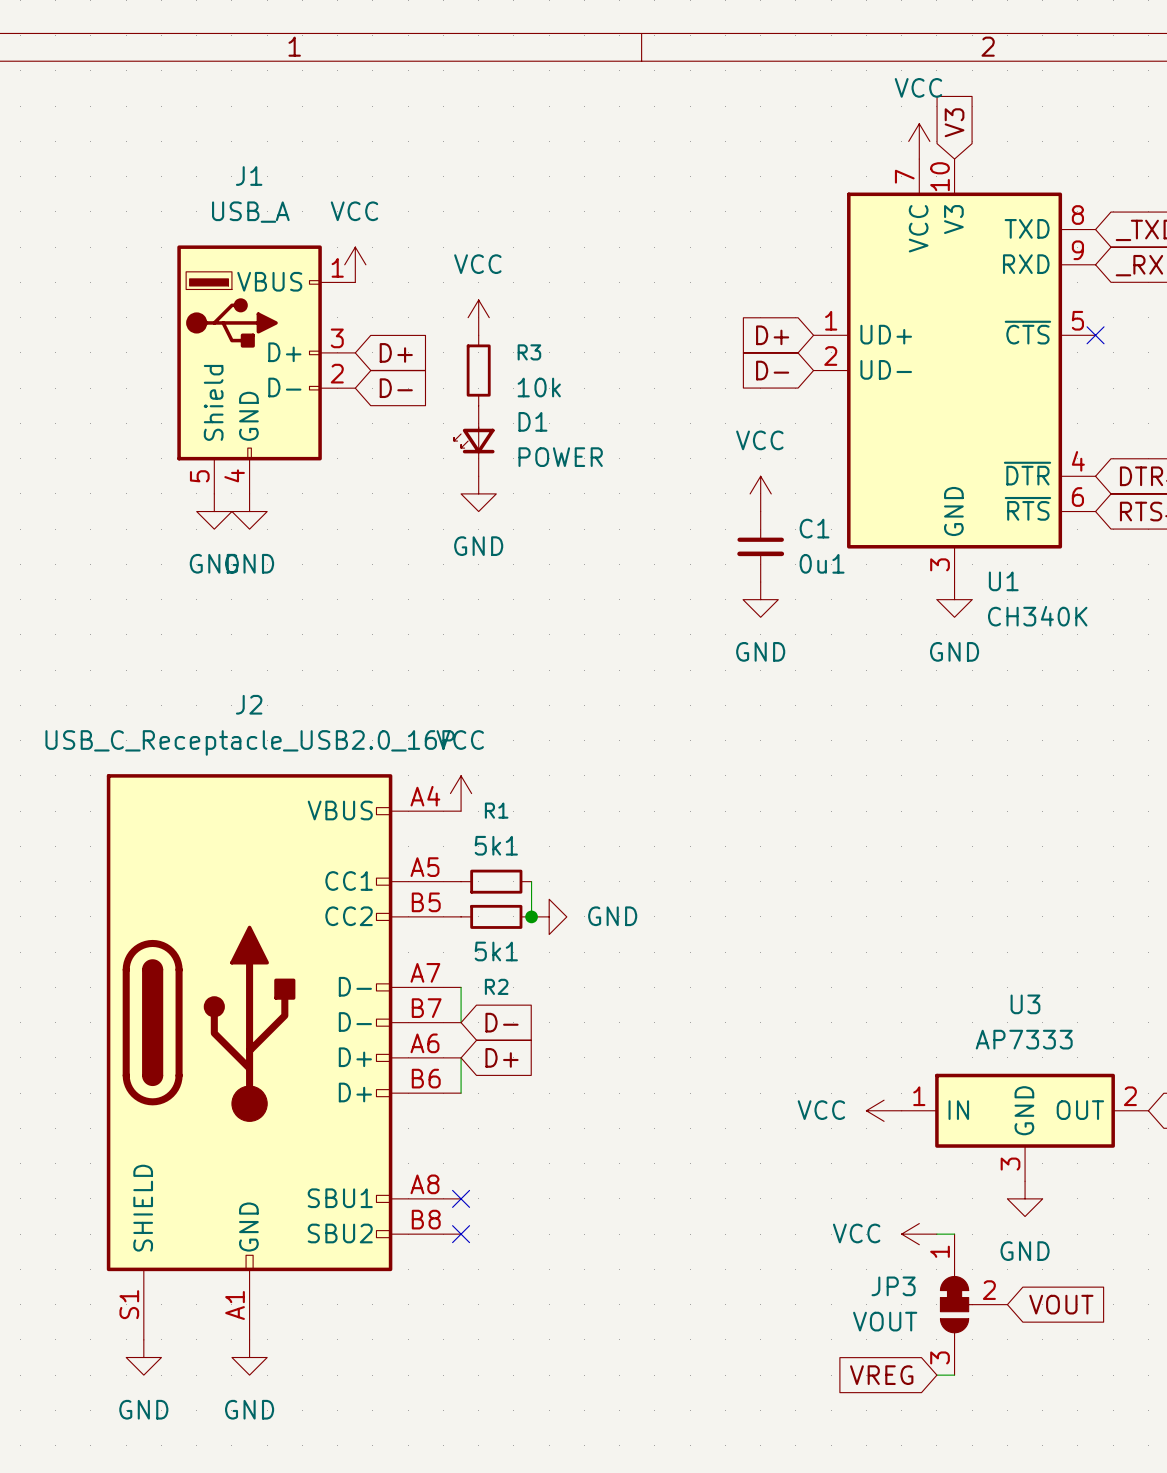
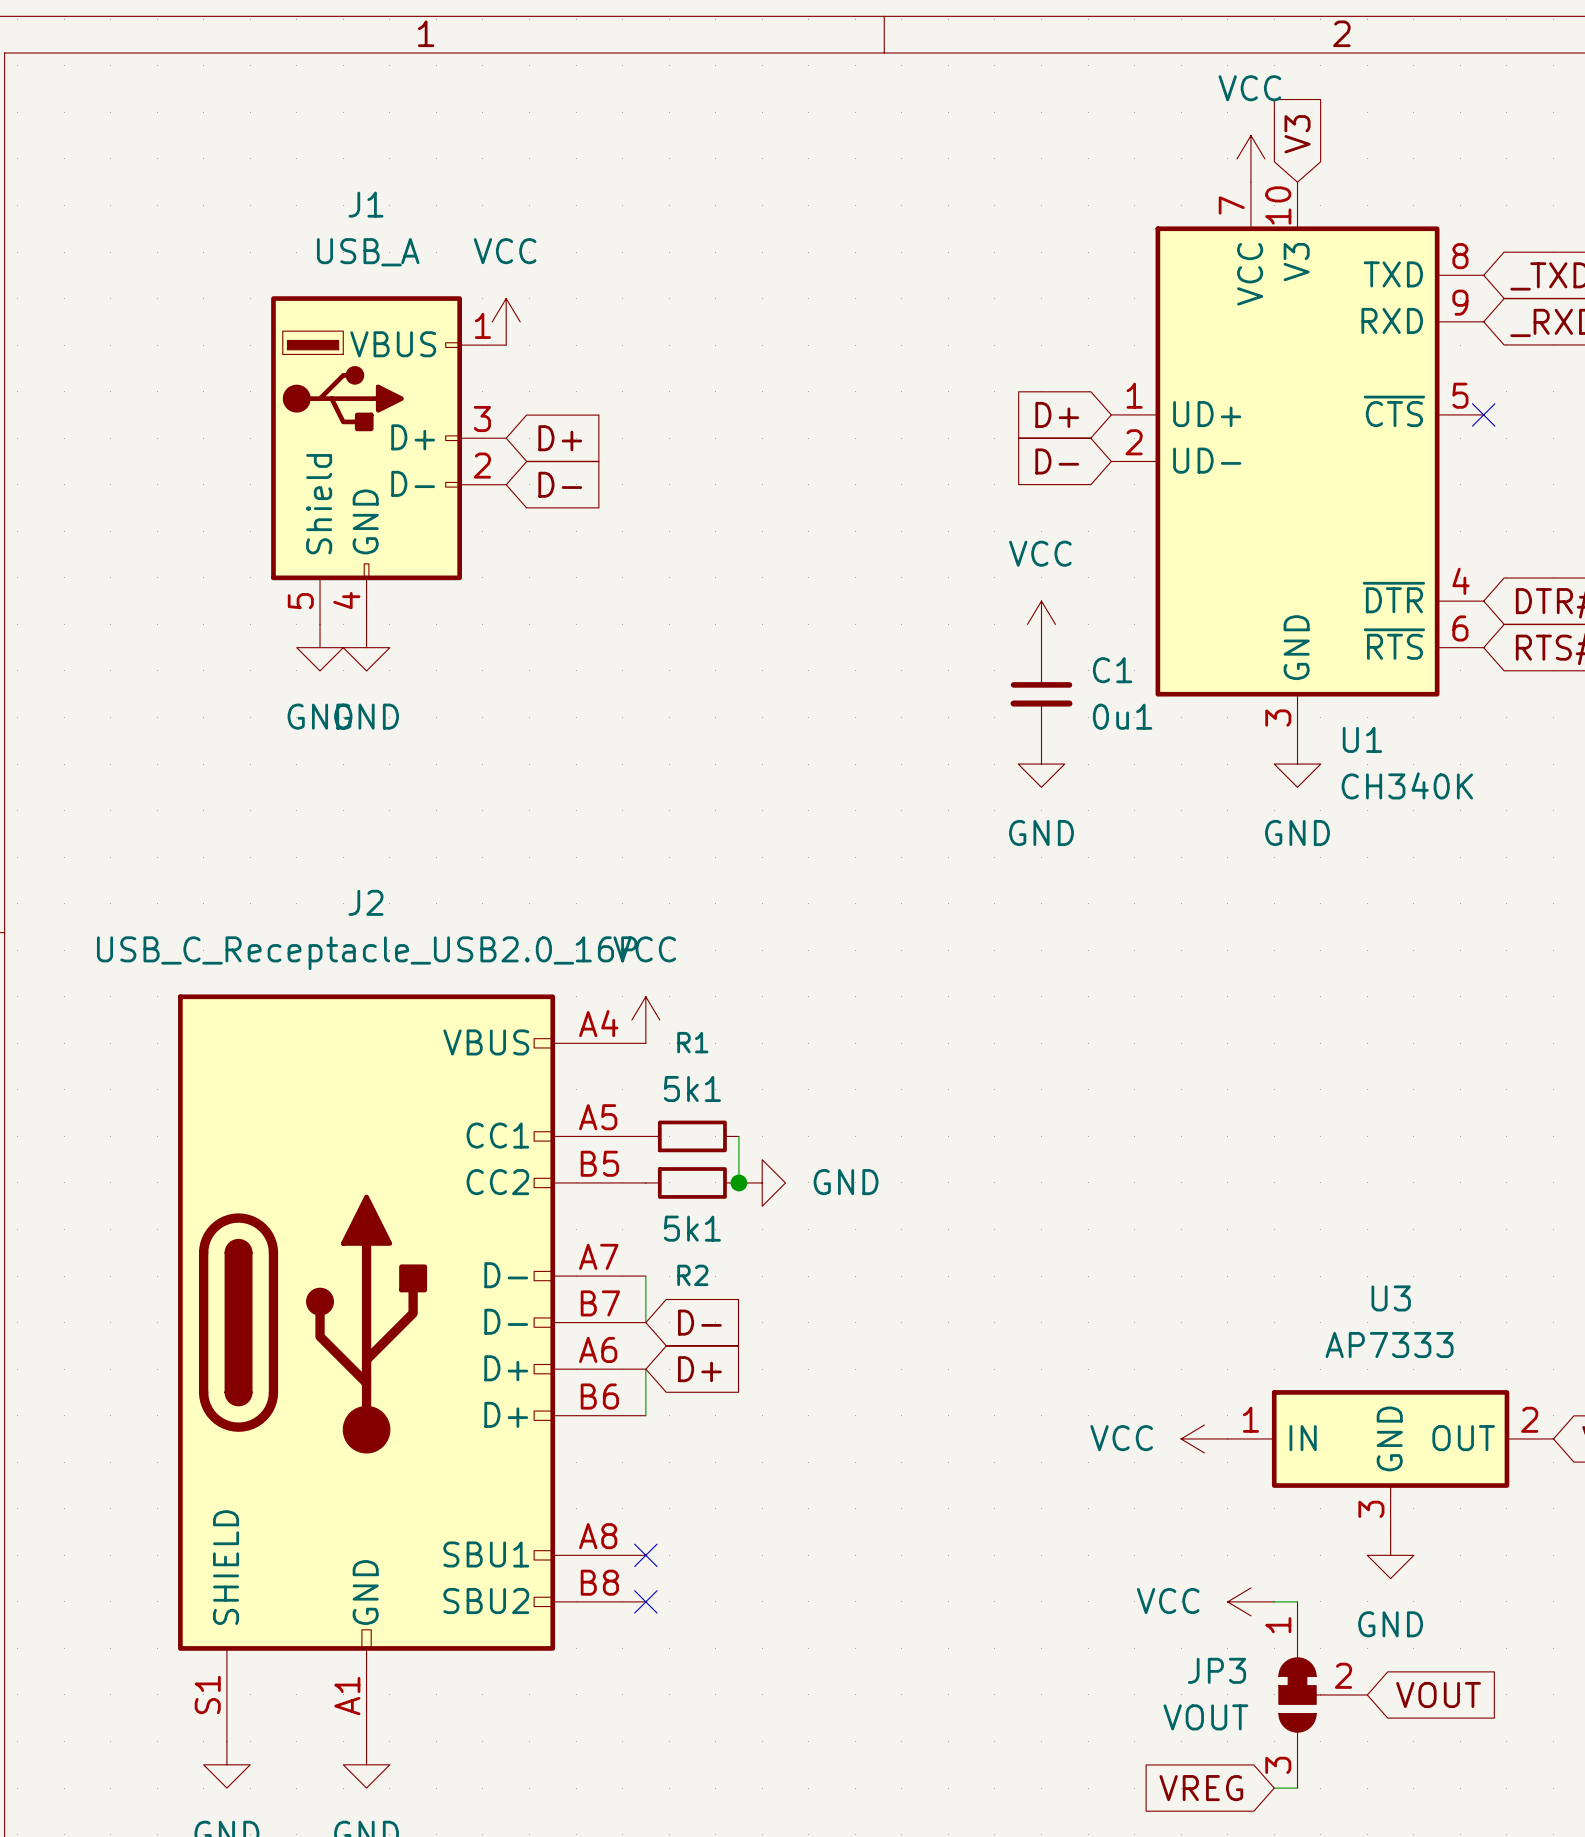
power symbol: VCC (478, 317) -> none
R3: 10k (478, 370) -> none
D1: POWER (474, 441) -> none
power symbol: GND (478, 493) -> none

